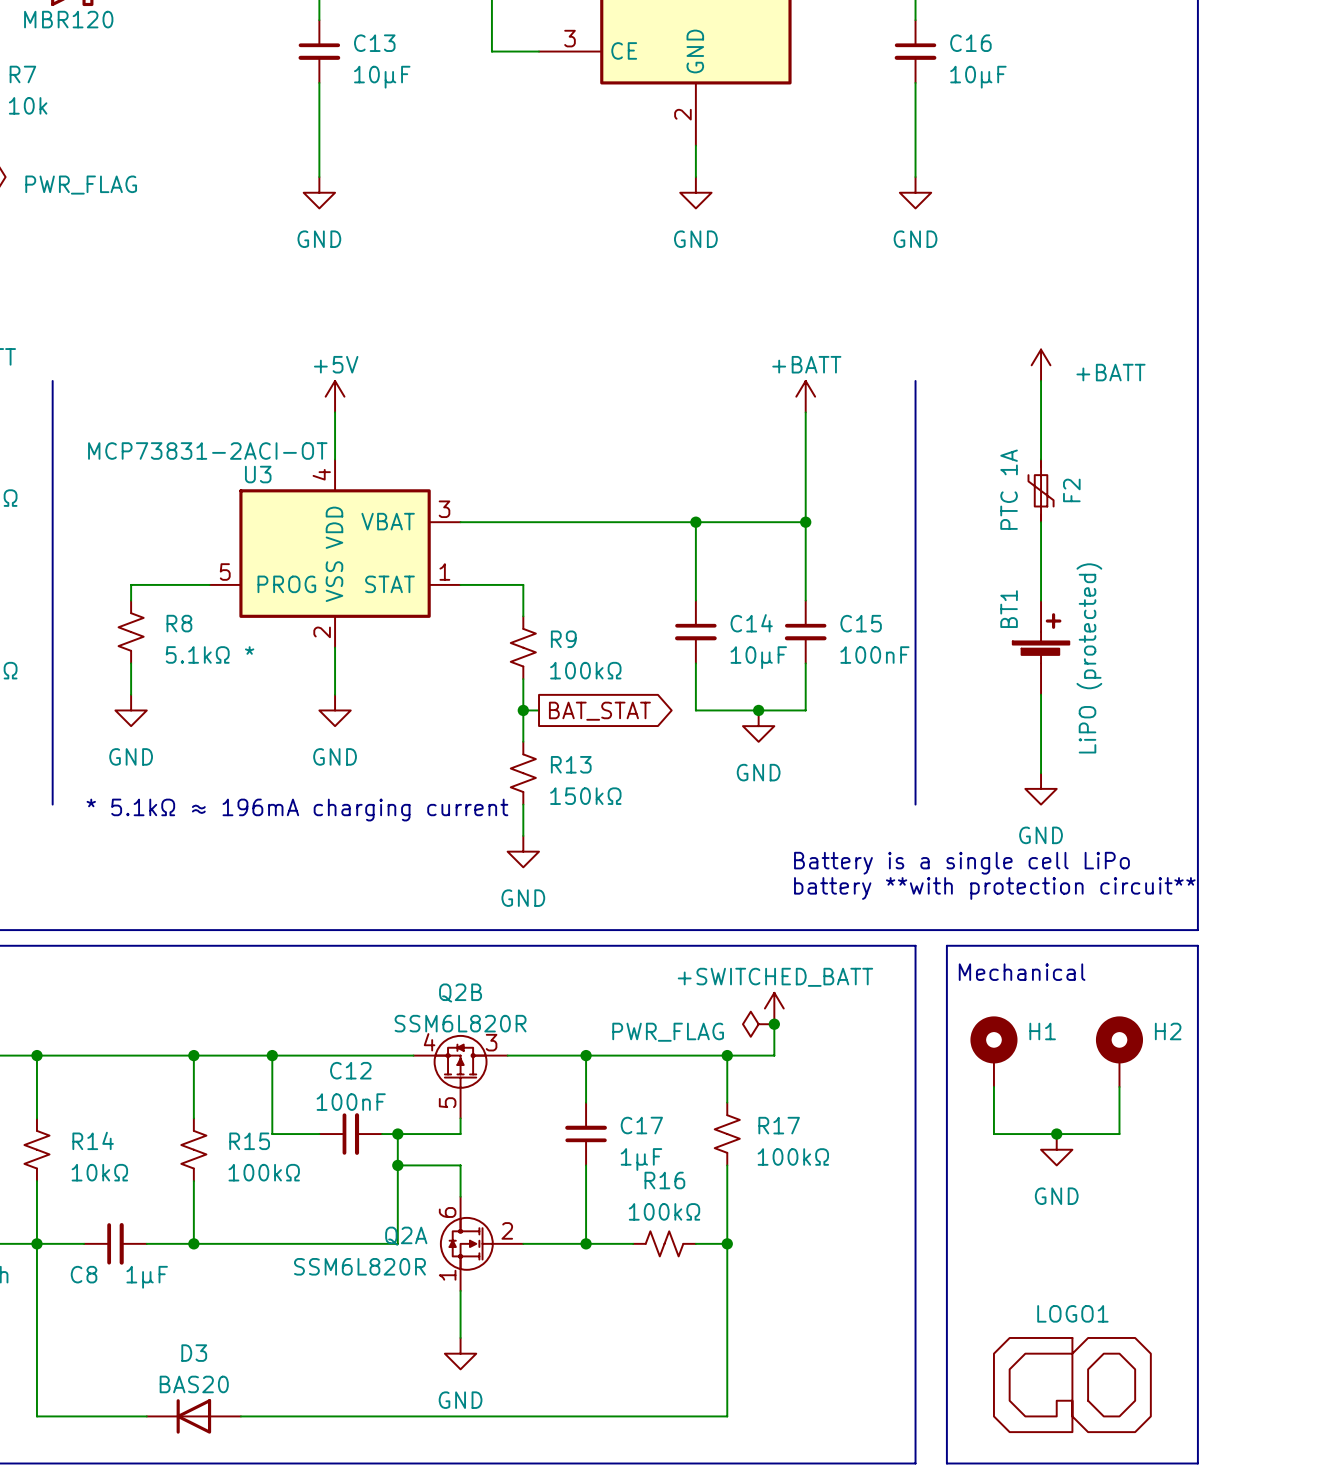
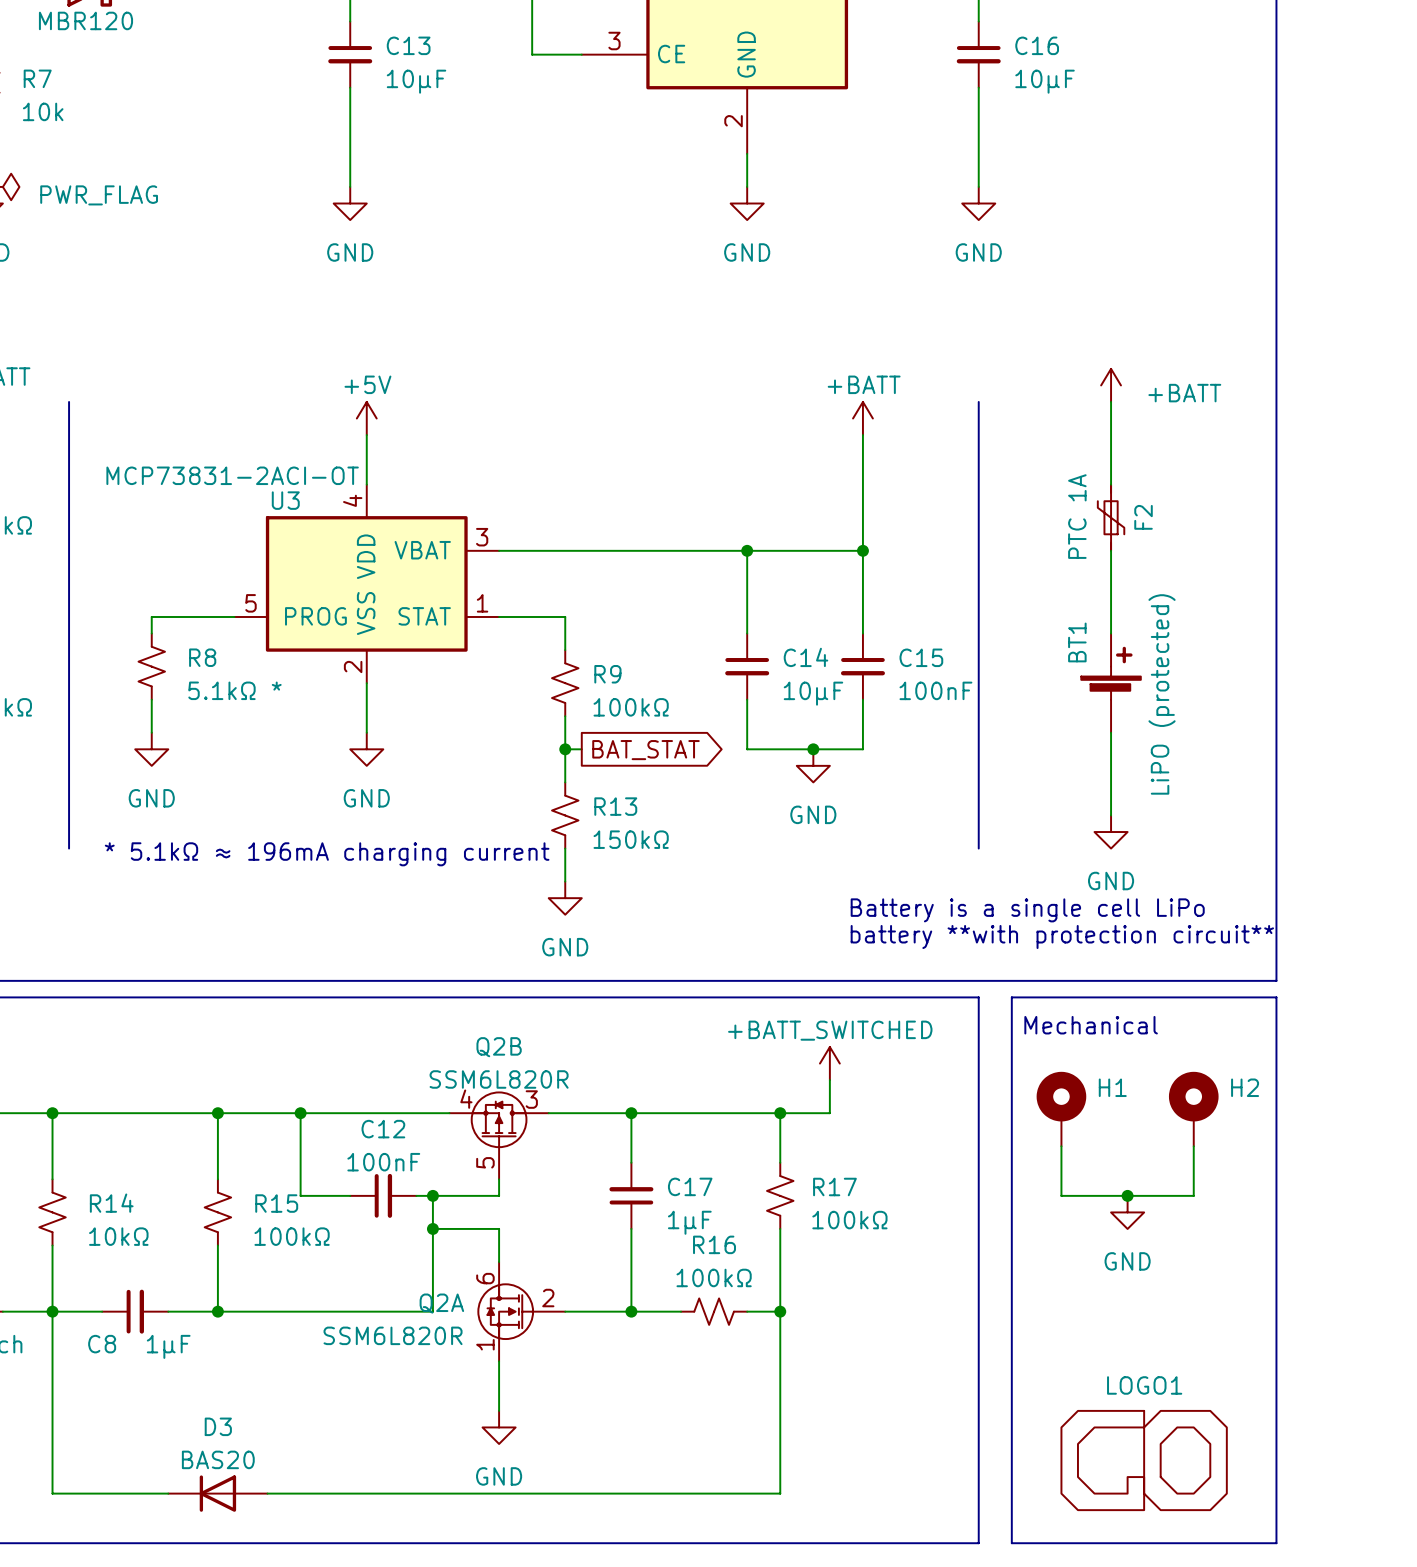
power symbol: +SWITCHED_BATT (774, 1008) -> +BATT_SWITCHED (829, 1063)
power symbol: PWR_FLAG (758, 1024) -> none
junction: (774, 1024) -> none

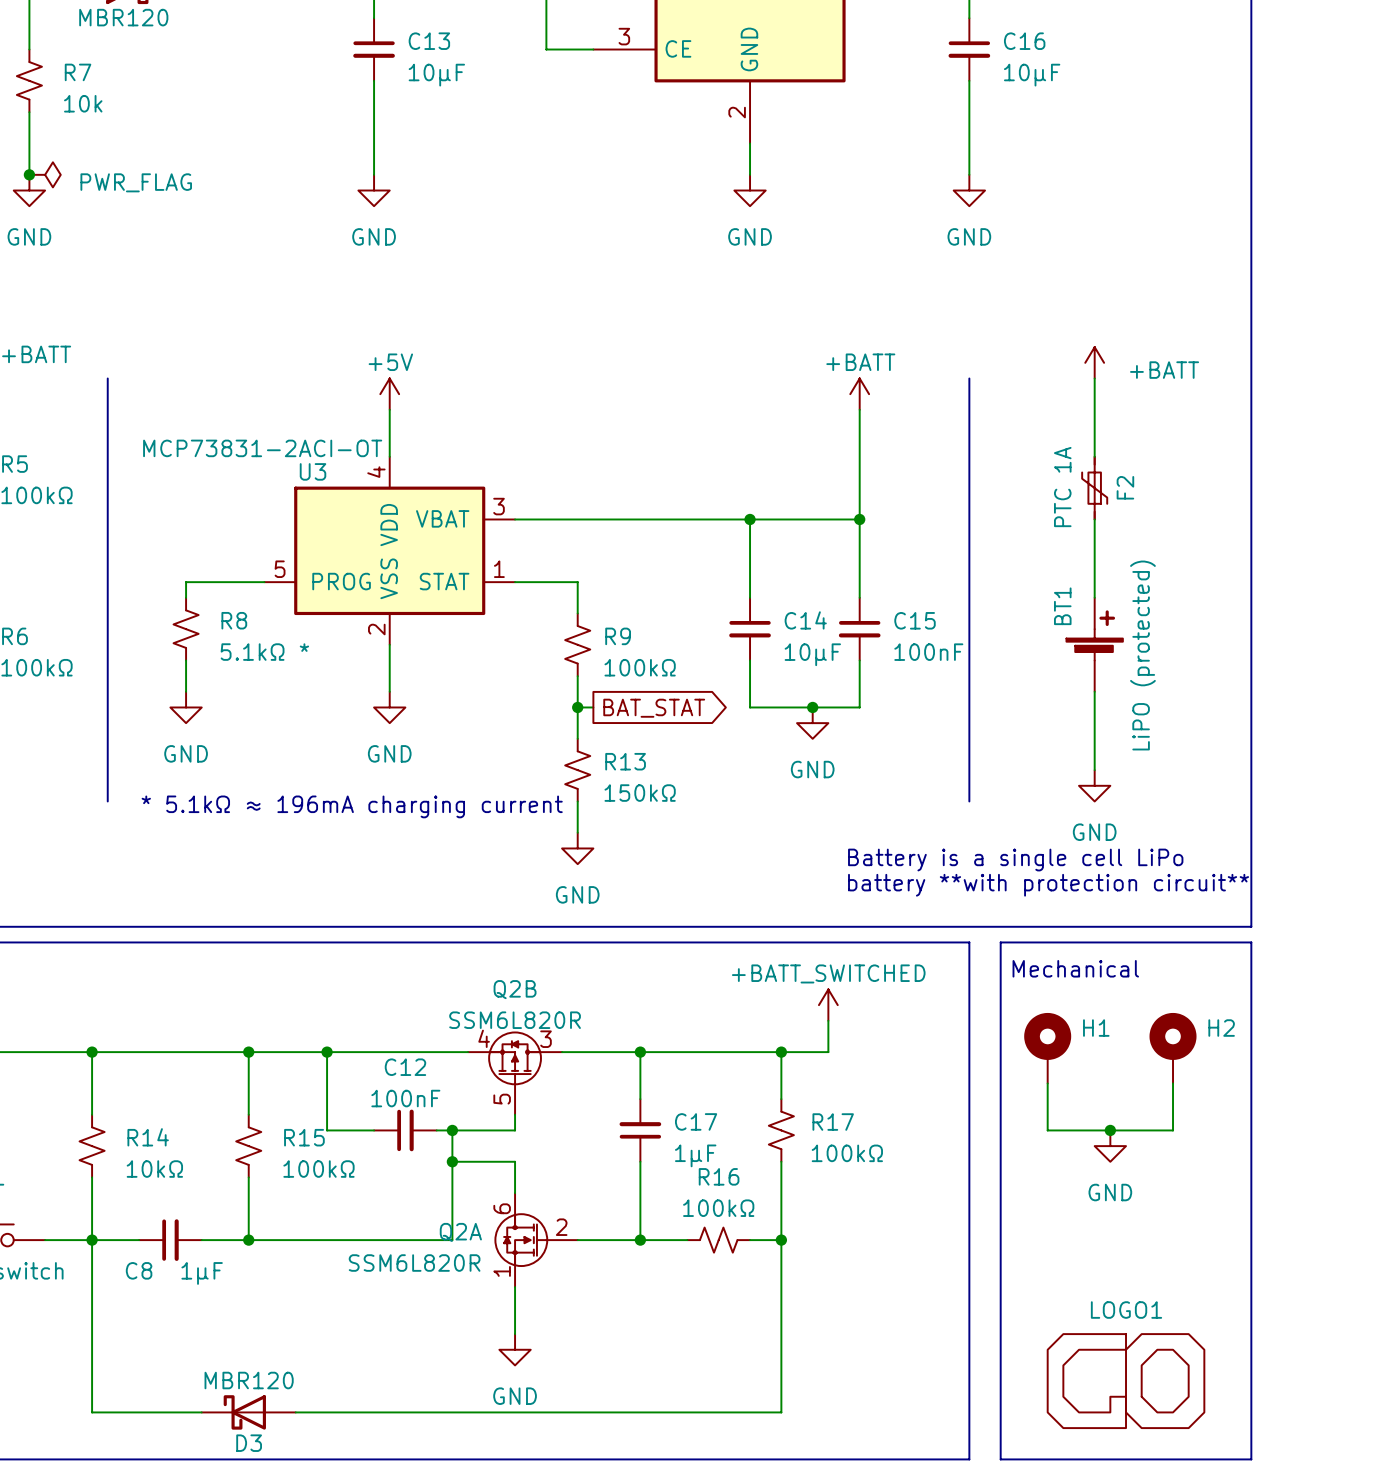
D3 name position: D3 (218, 1426) -> D3 (249, 1443)
D3 value: BAS20 (218, 1459) -> MBR120 (249, 1380)
D3 symbol: [168, 1475, 268, 1512] -> [201, 1395, 296, 1430]

